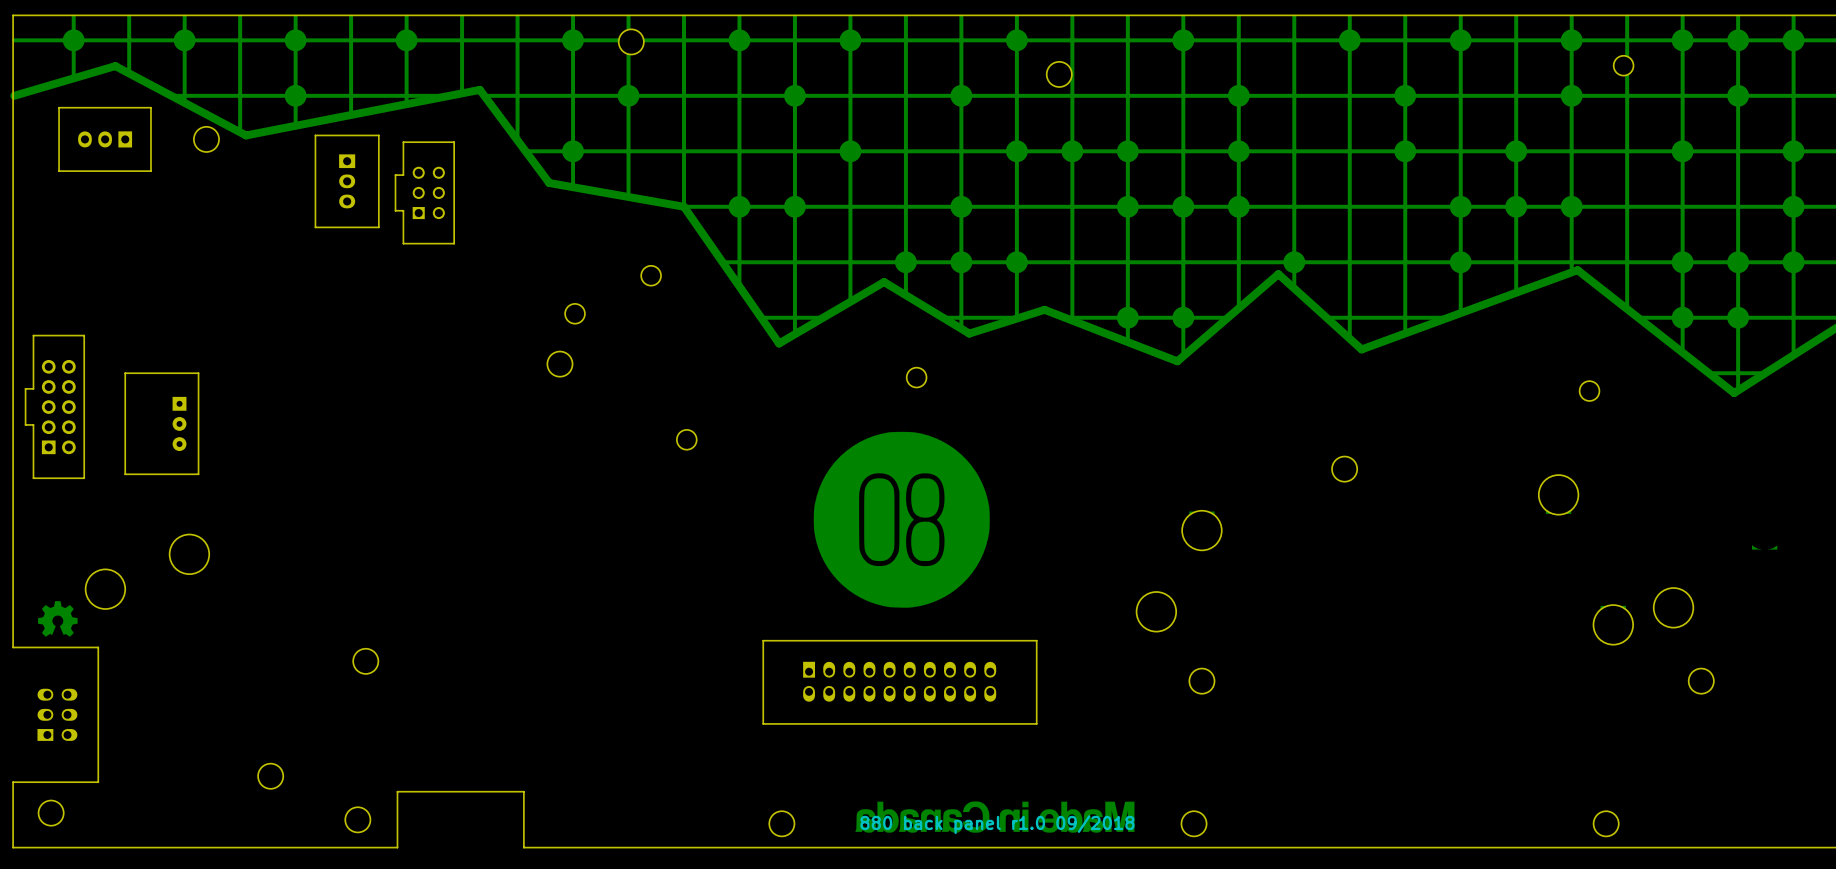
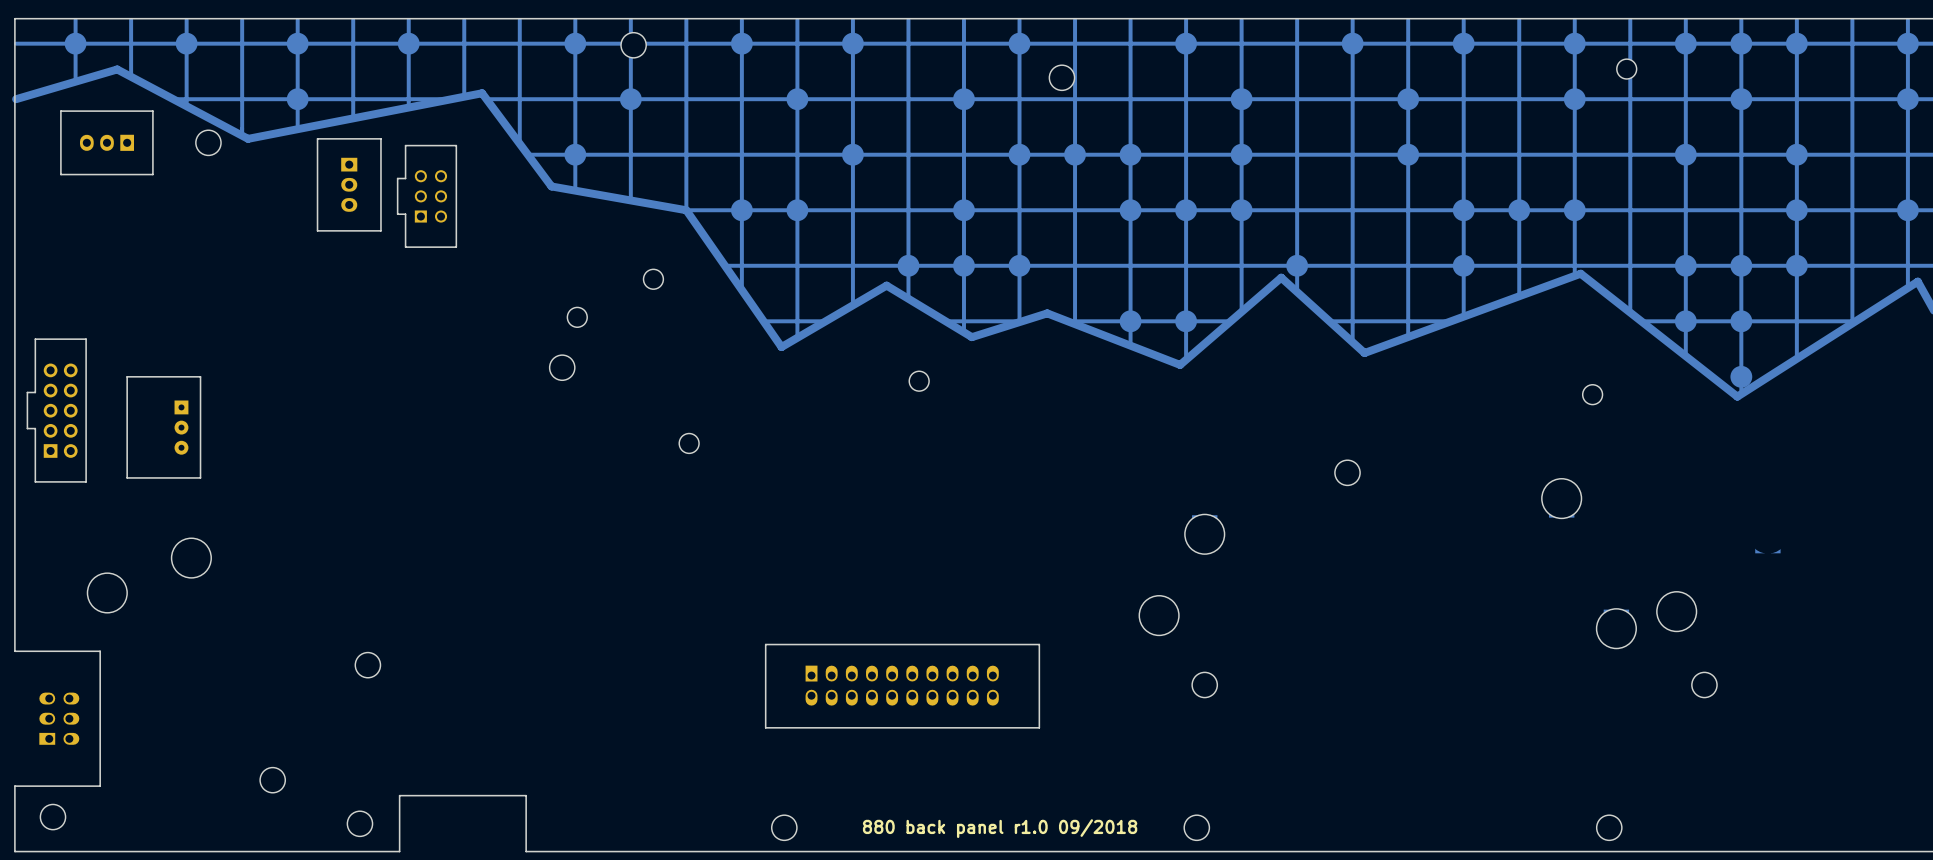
part: (1516, 151) -> none
bottom track: (1708, 373) (1765, 373) -> none
part: none -> (1741, 376)
drawing: [813, 431, 990, 608] -> none
drawing: [38, 601, 78, 637] -> none
drawing: [855, 801, 1135, 833] -> none

